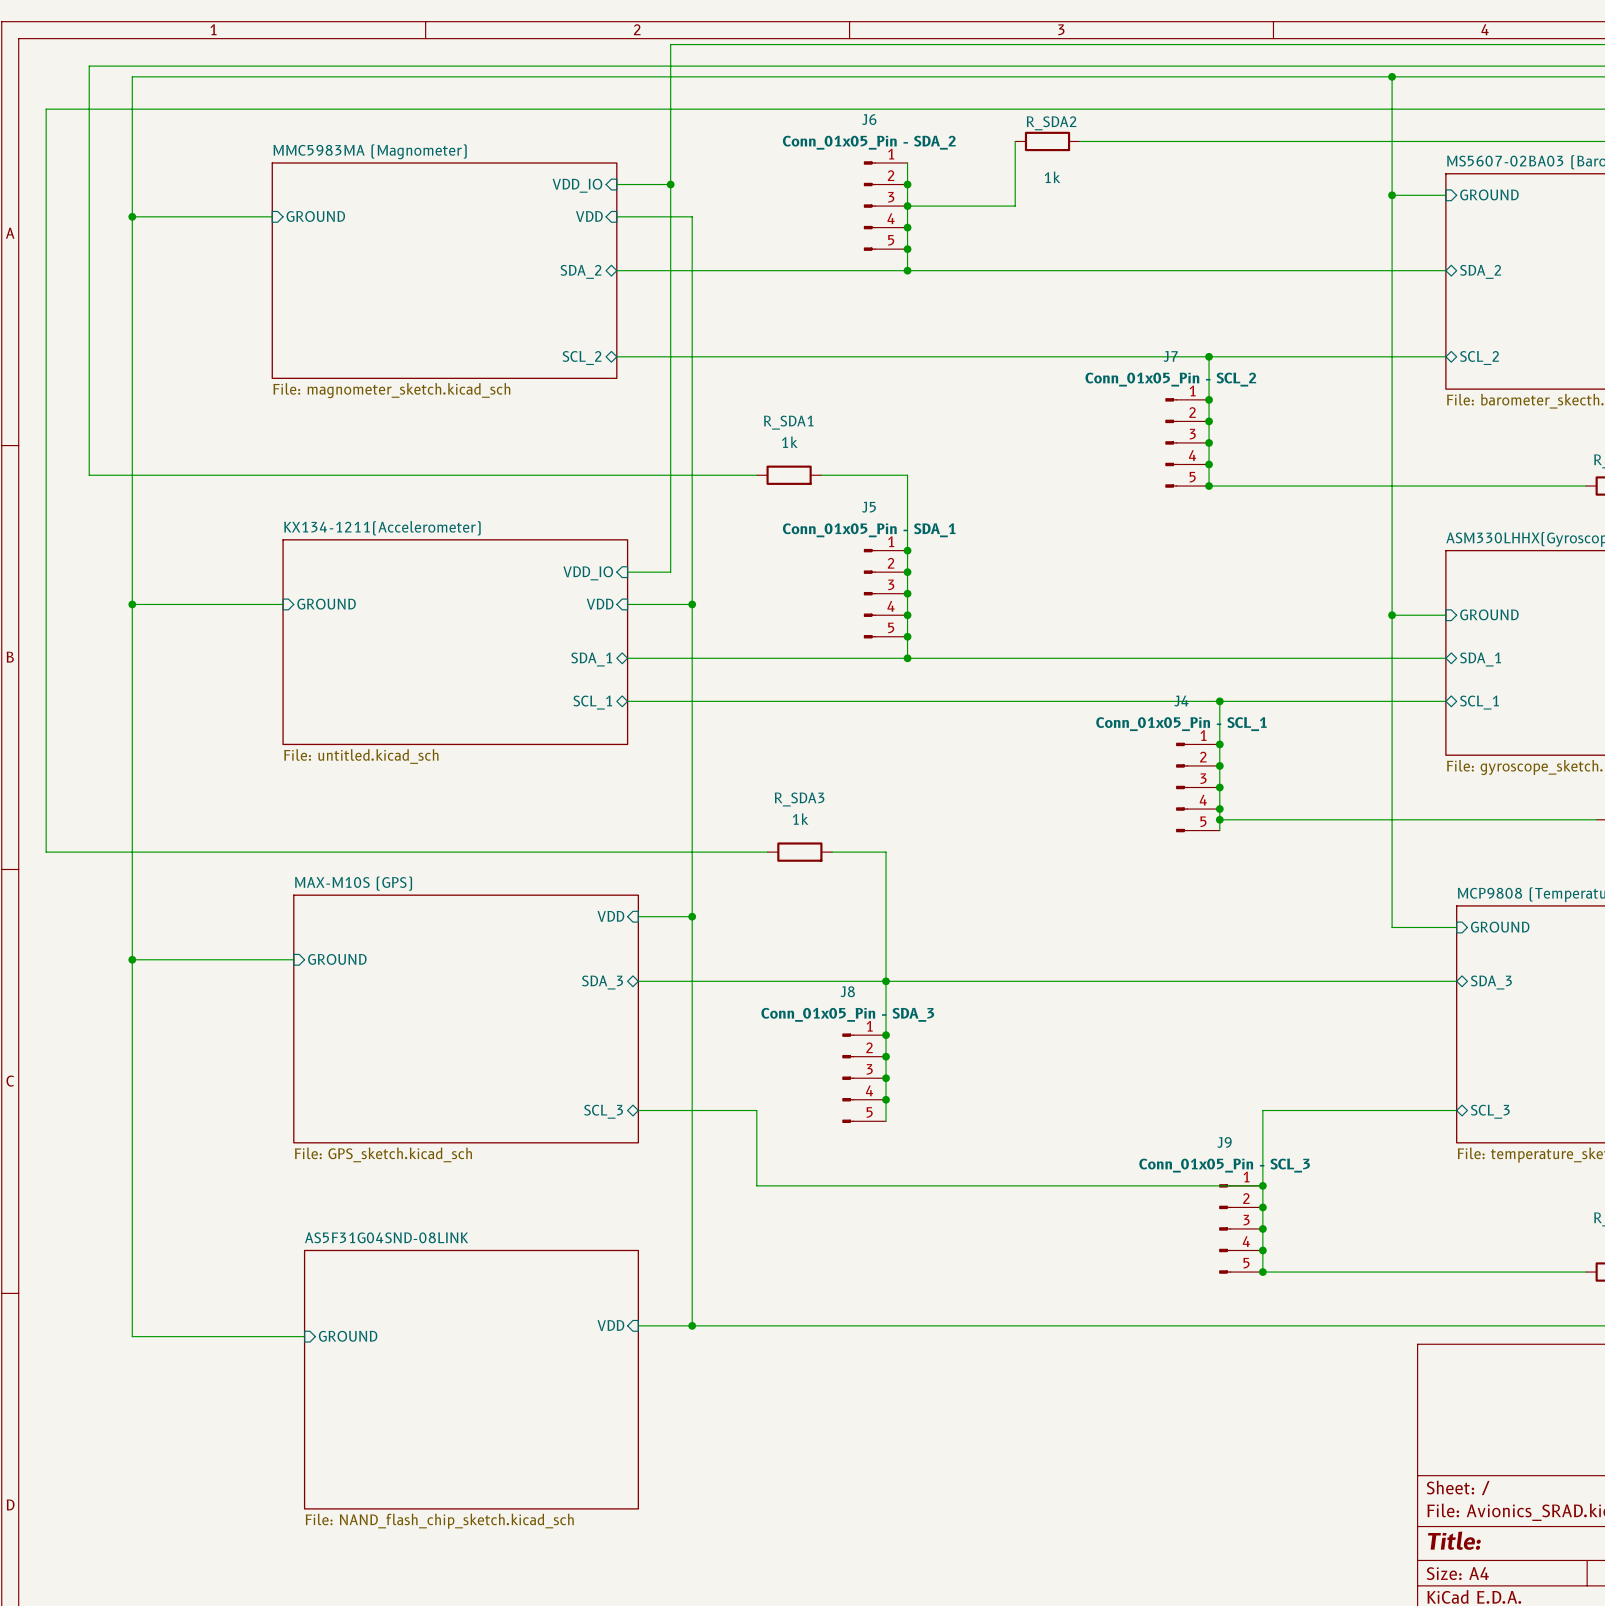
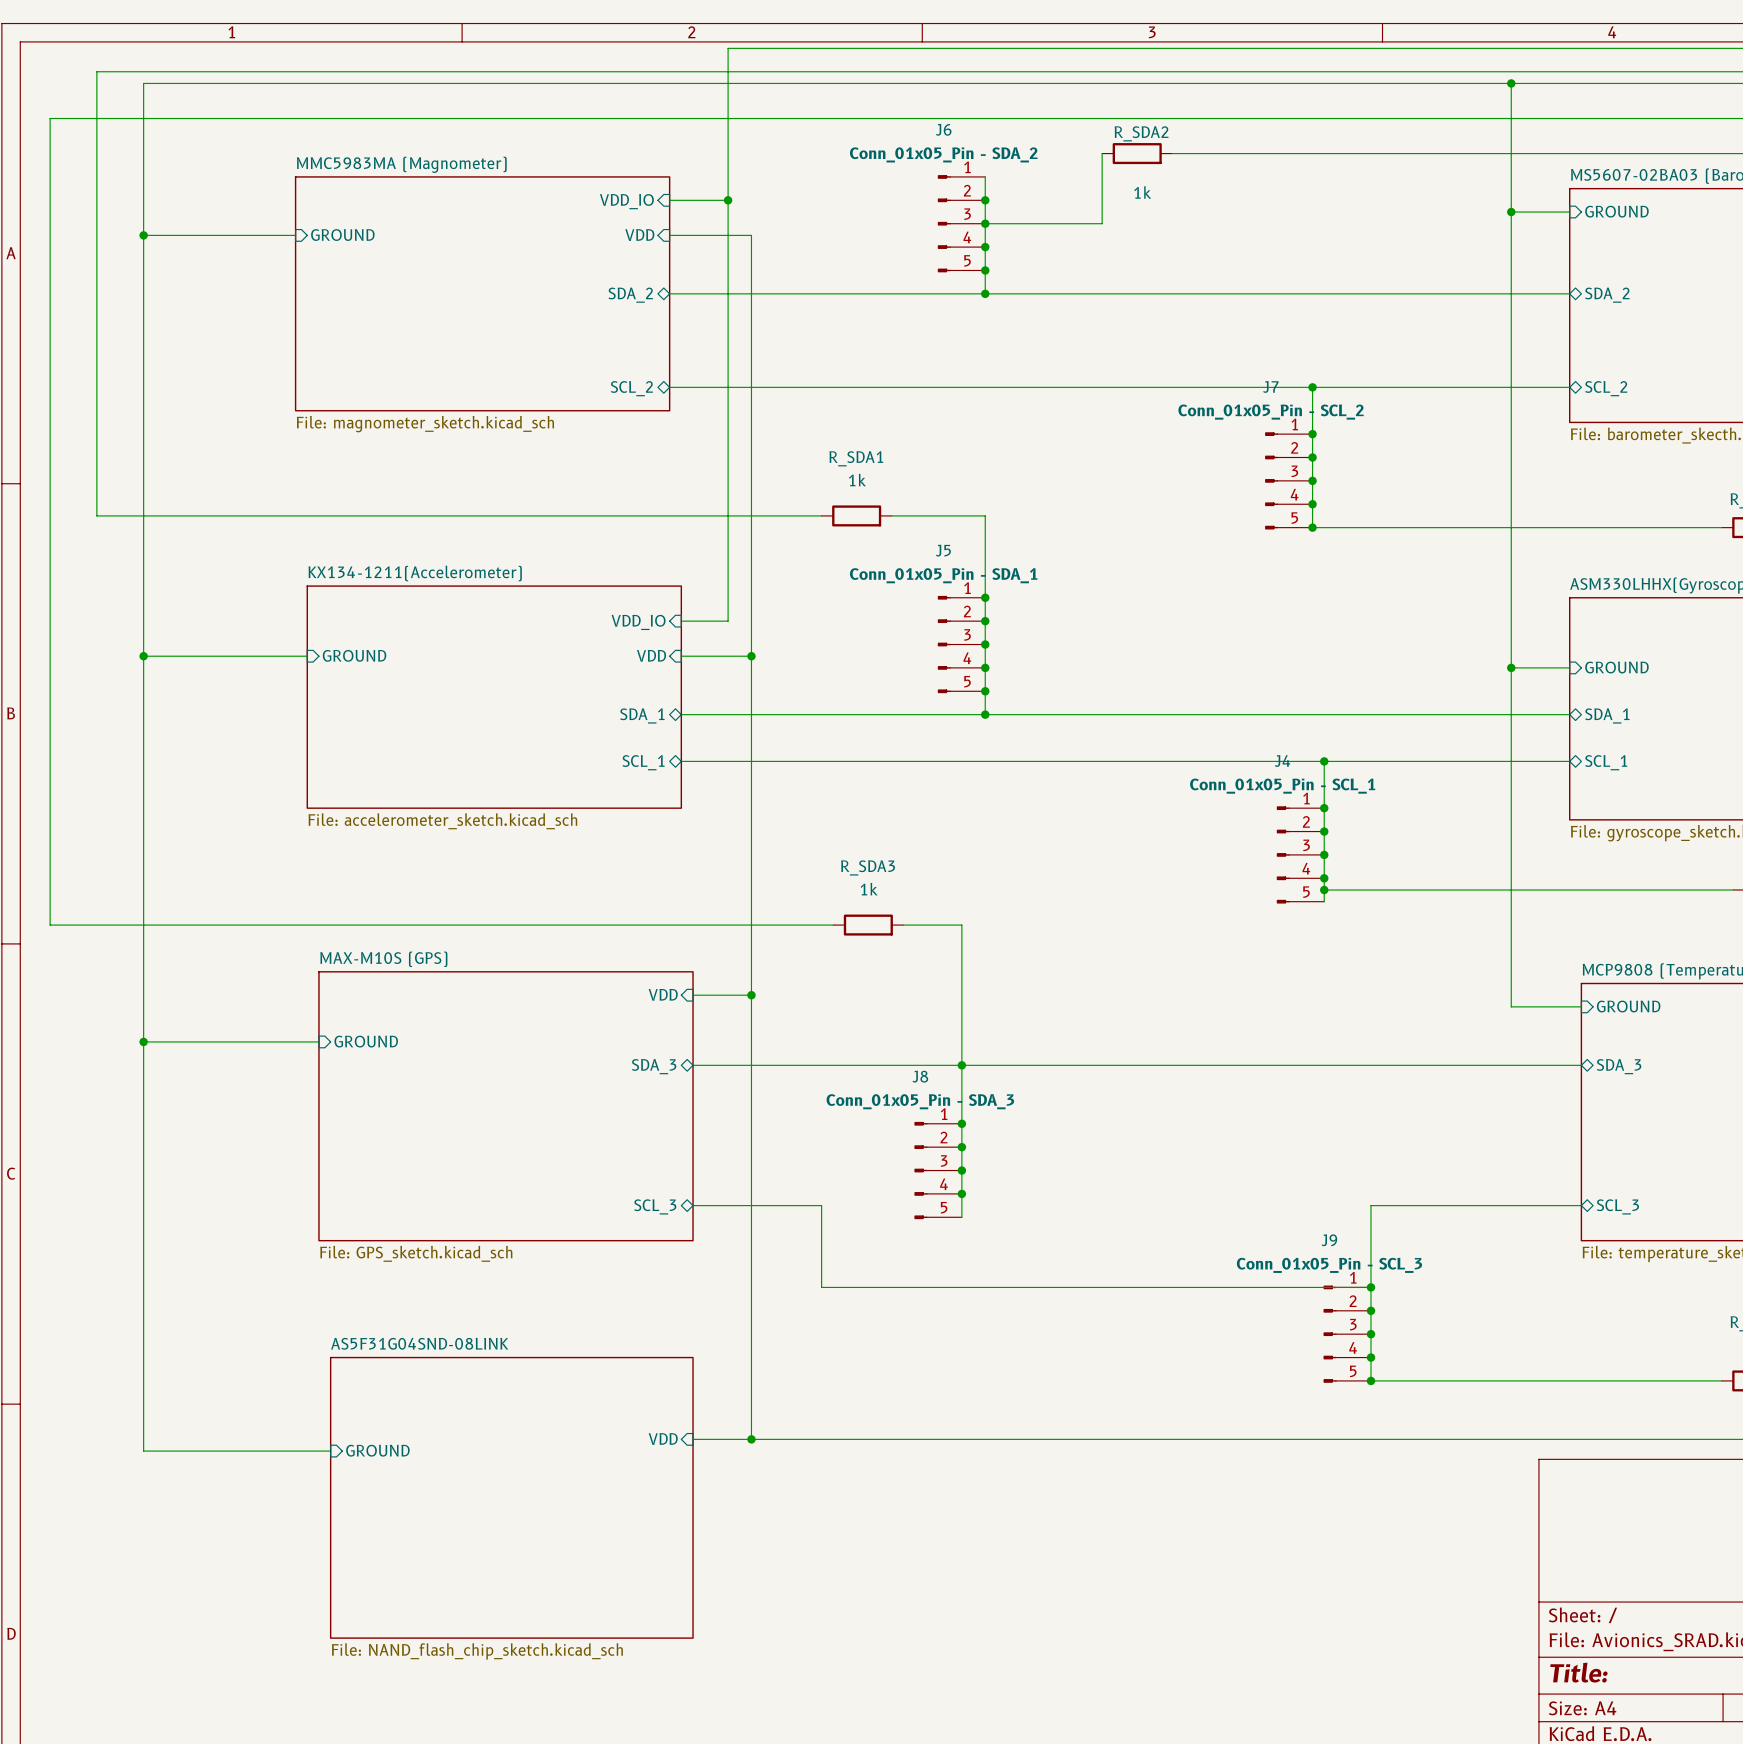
sheet KX134-1211(Accelerometer) value: File: untitled.kicad_sch (361, 756) -> File: accelerometer_sketch.kicad_sch (442, 821)

